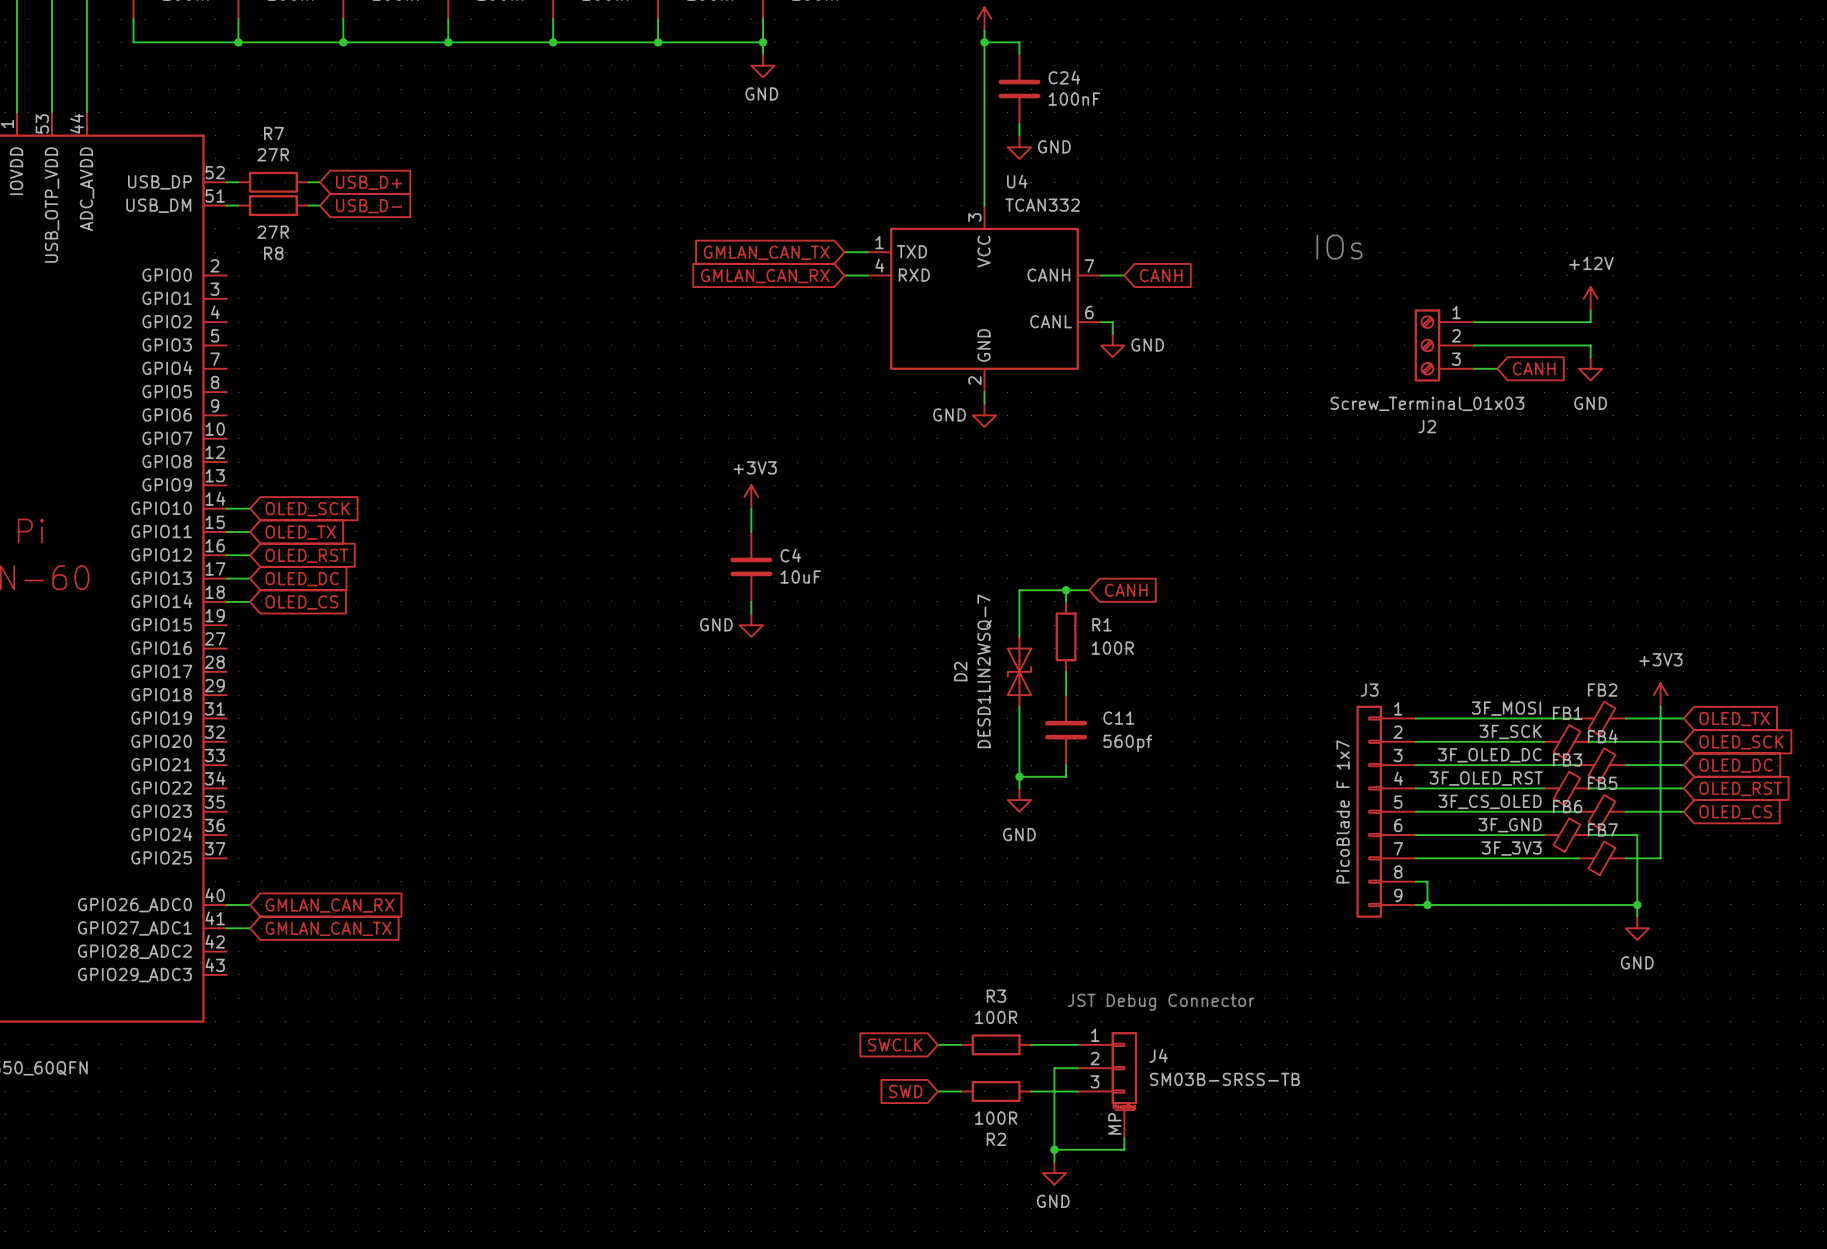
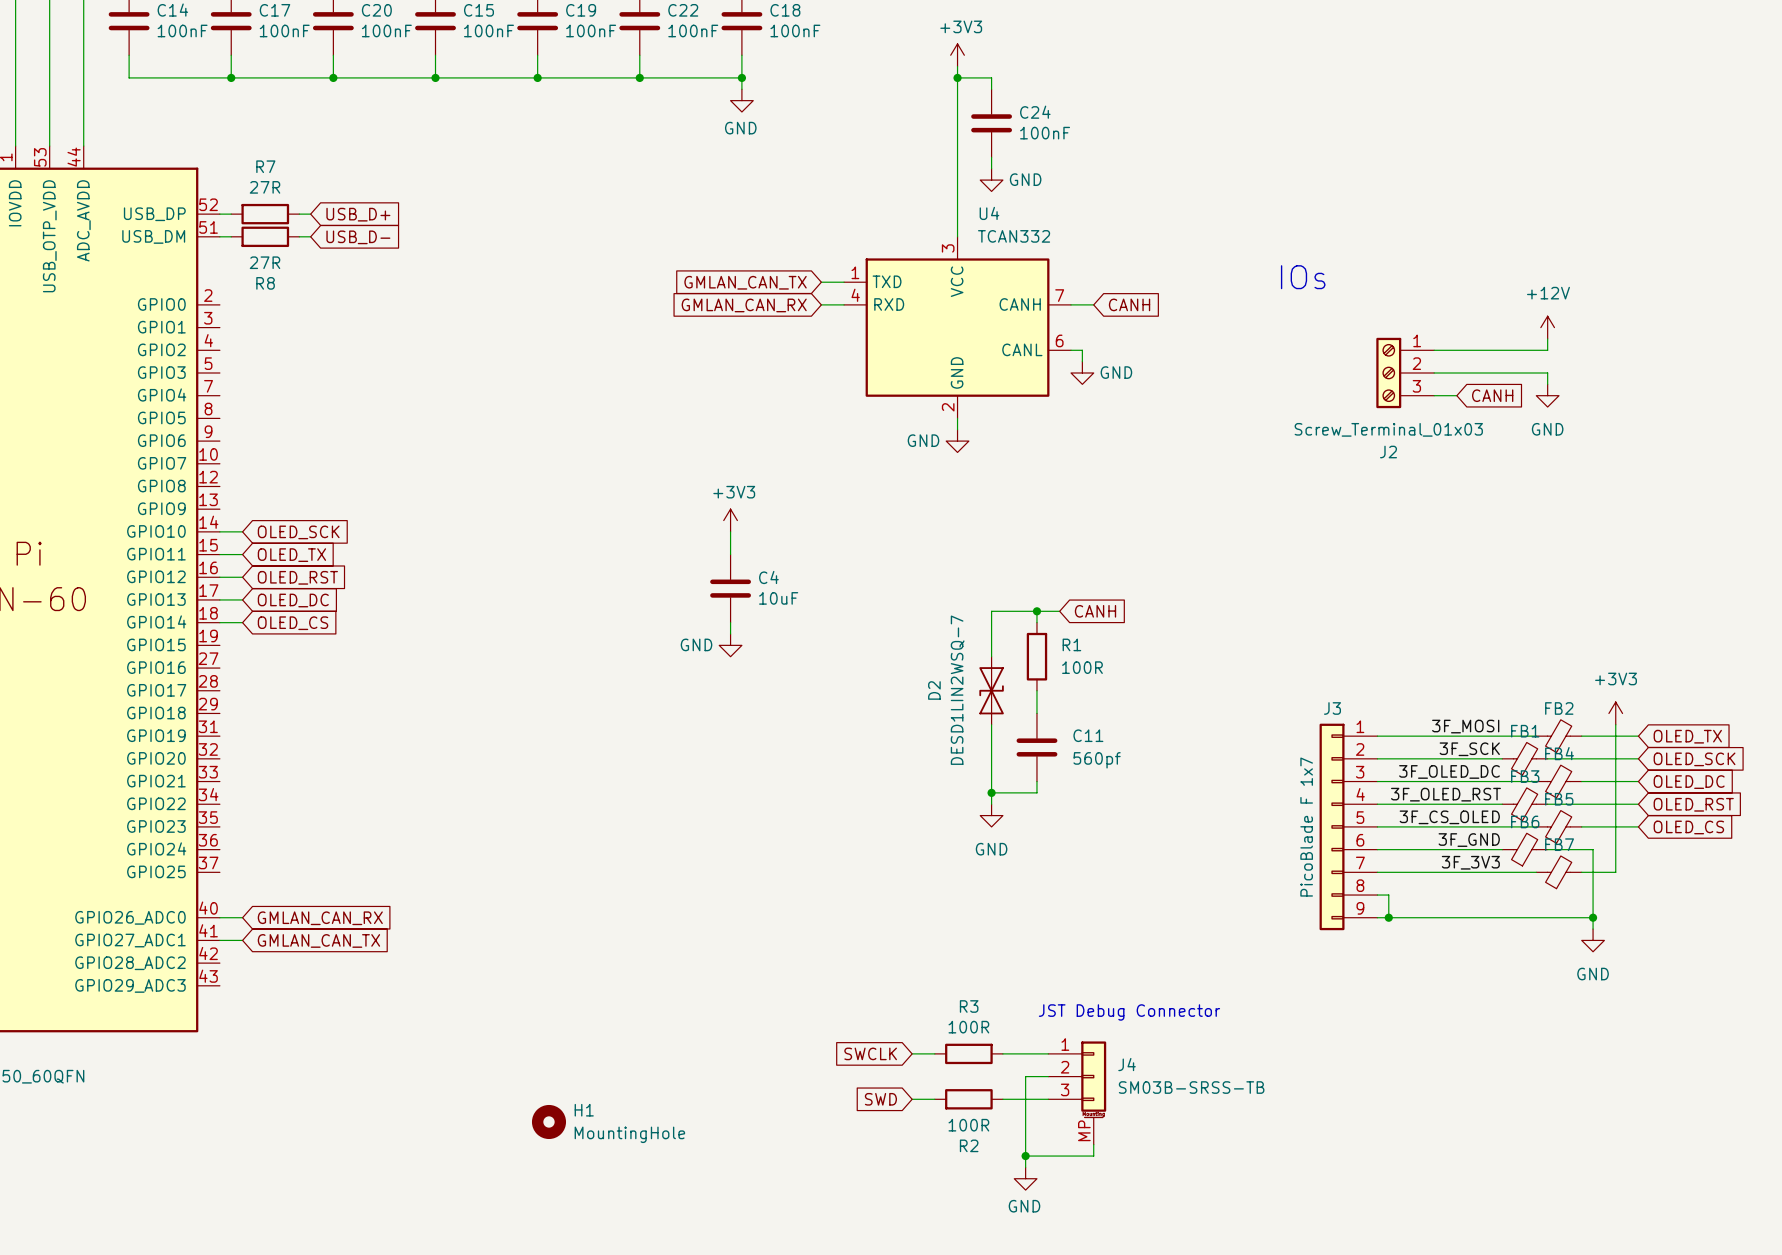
H1: none -> MountingHole (548, 1121)

